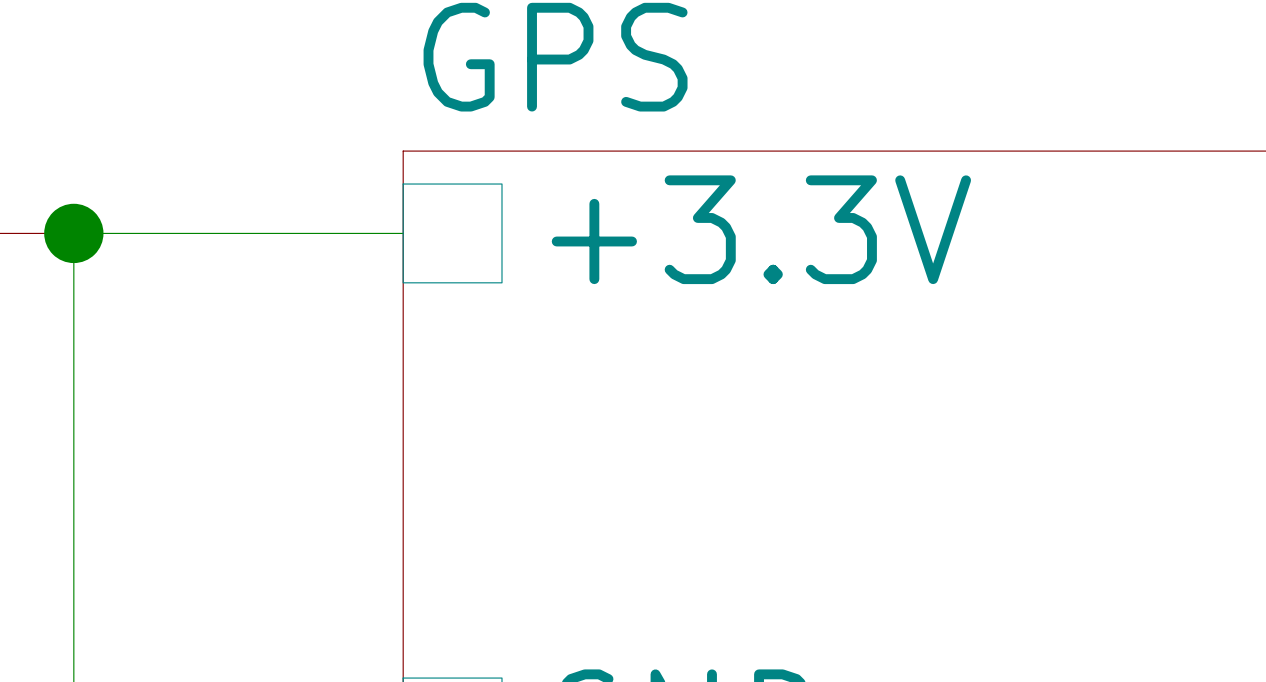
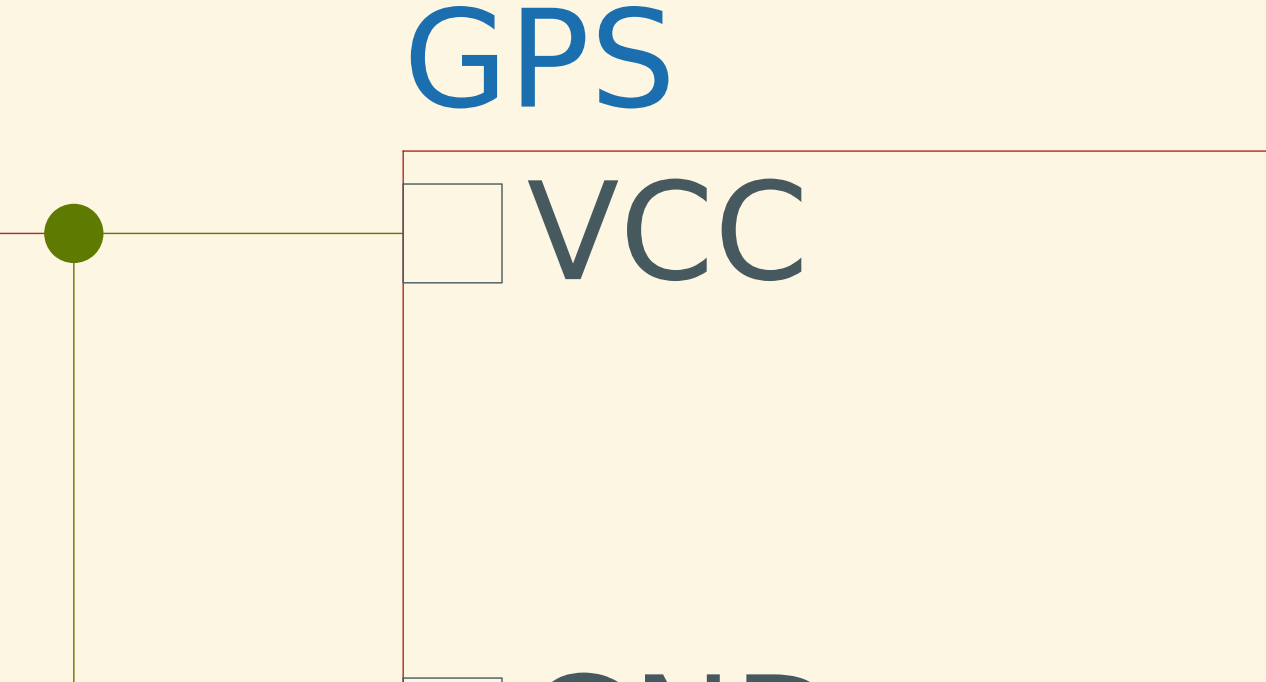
sheet pin: +3.3V (761, 229) -> VCC (664, 229)

